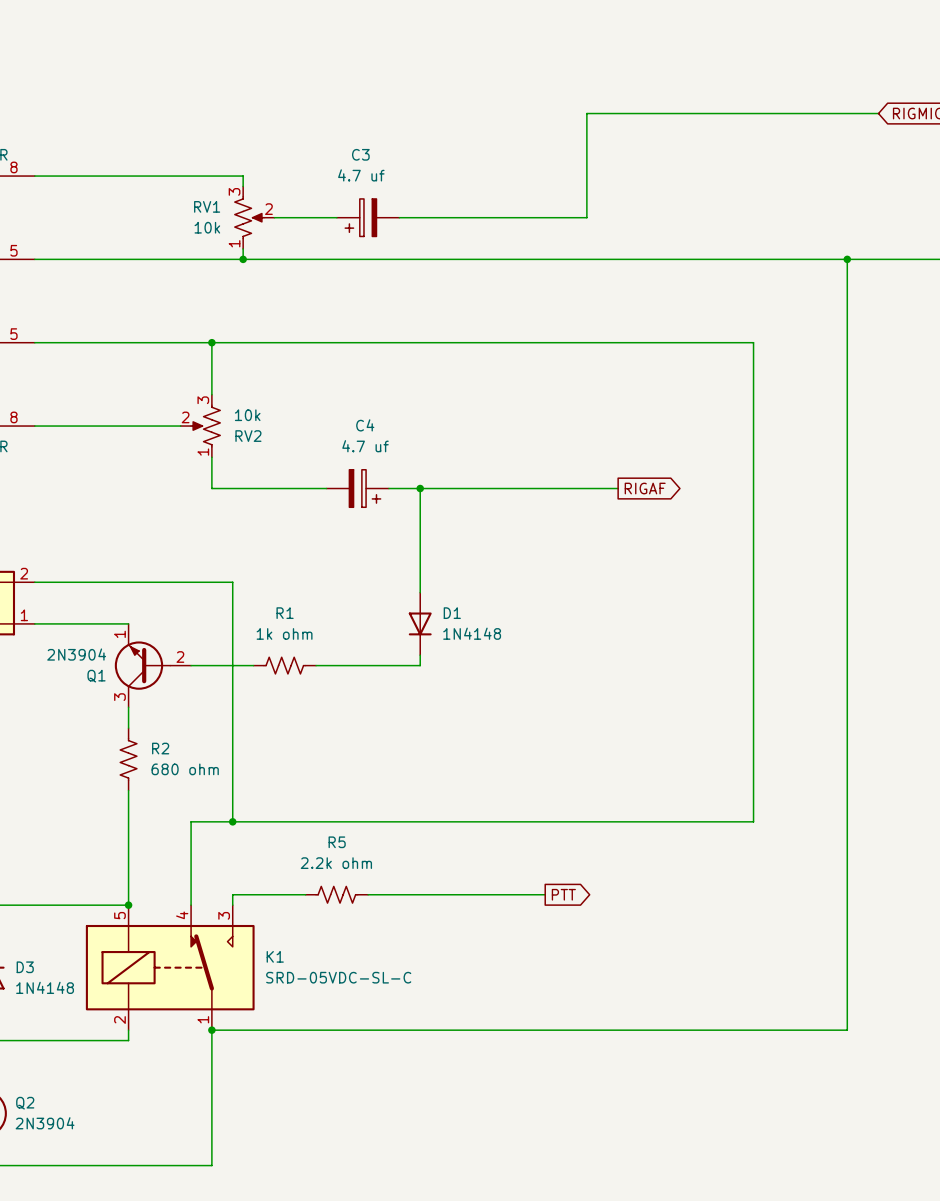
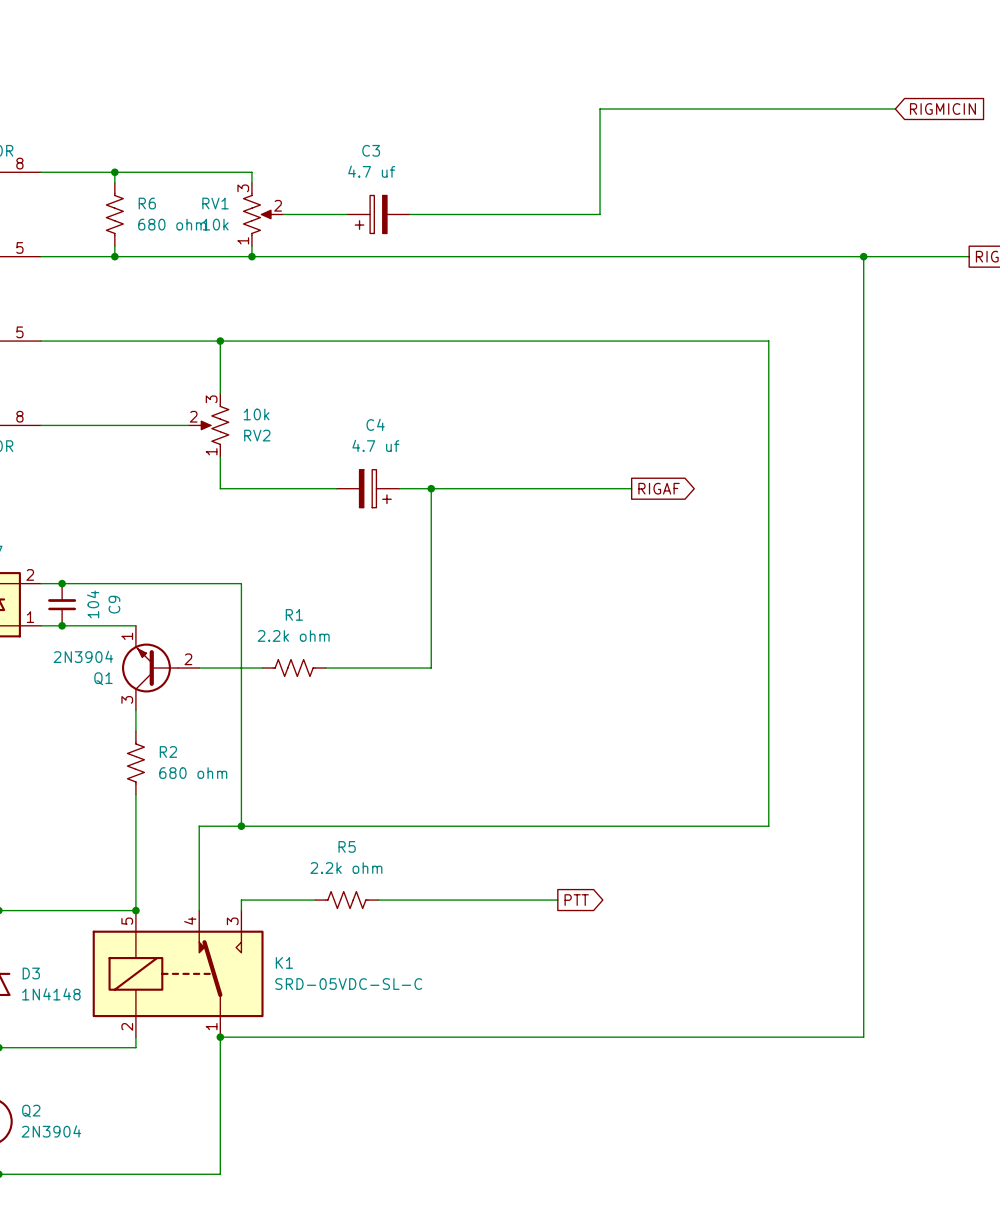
wire: none -> (114, 172) (114, 182)
junction: none -> (114, 172)
R6: none -> 680 ohm (114, 214)
wire: none -> (114, 246) (114, 256)
junction: none -> (114, 256)
junction: none -> (62, 583)
C9: none -> 104 (62, 604)
junction: none -> (62, 625)
D1: 1N4148 (420, 623) -> none
R1 value: 1k ohm (284, 633) -> 2.2k ohm (293, 635)

